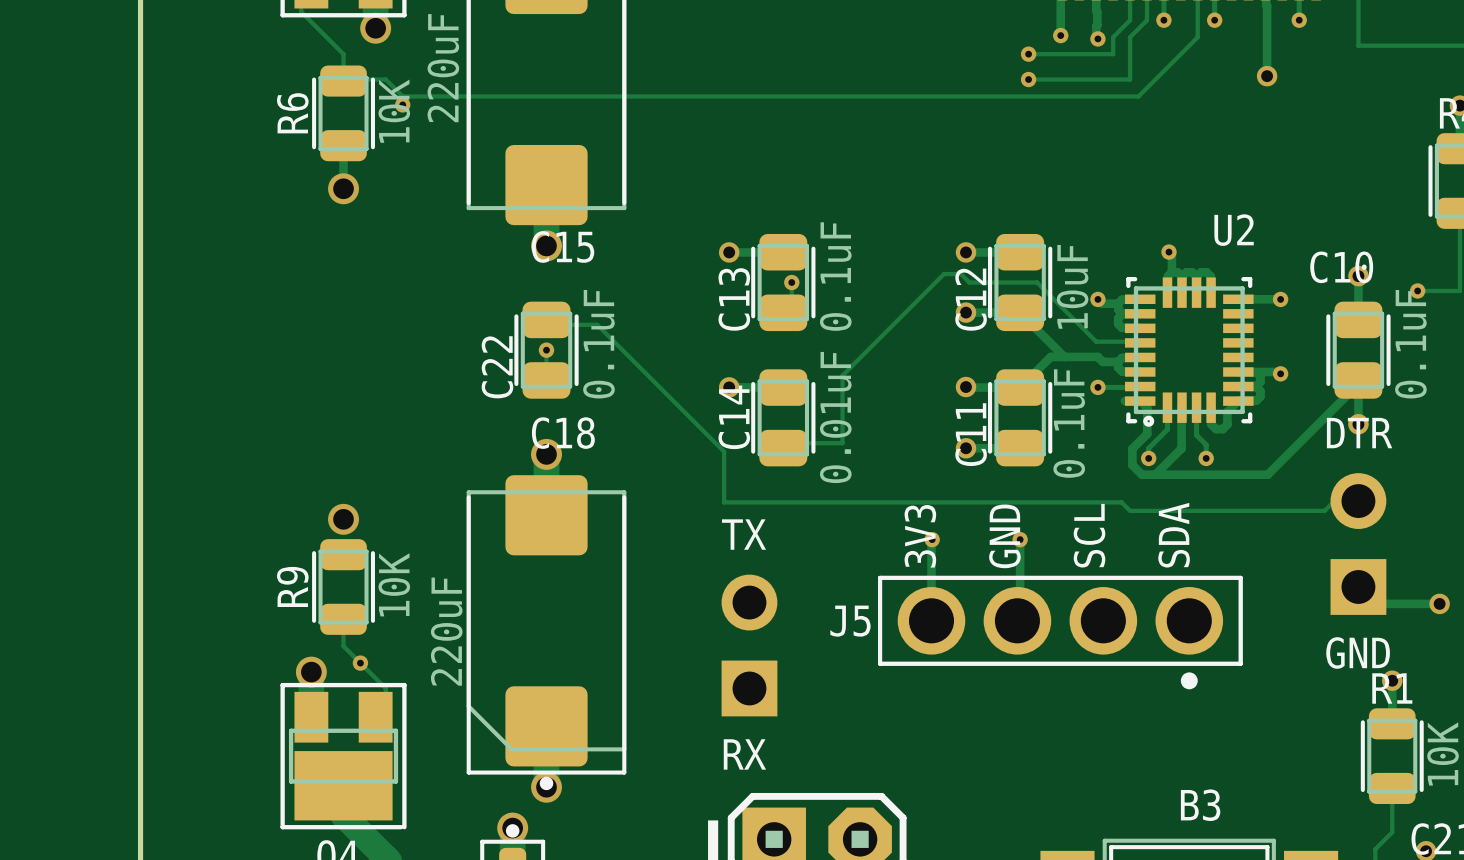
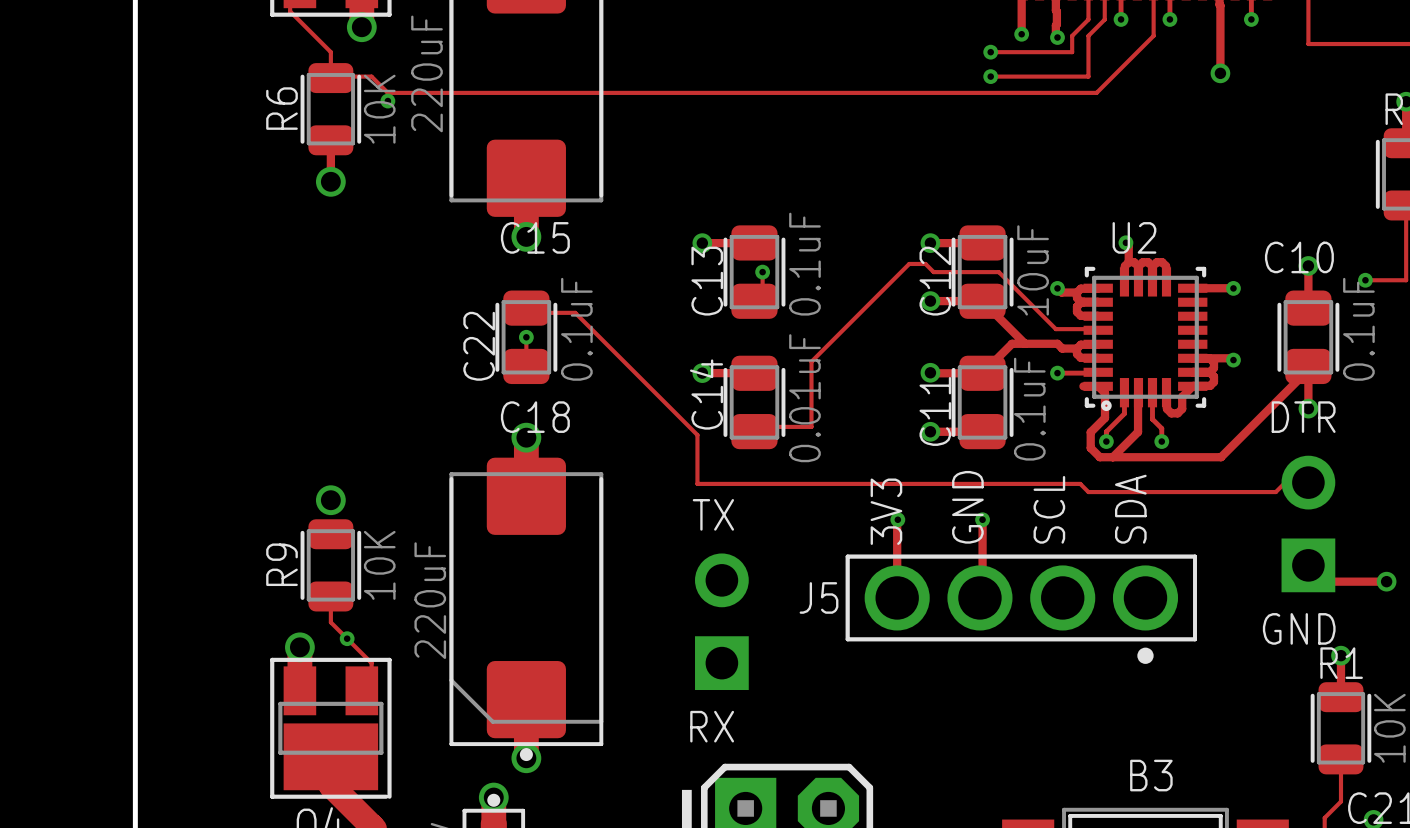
U2 name position: U2 (1234, 230) -> U2 (1134, 237)

